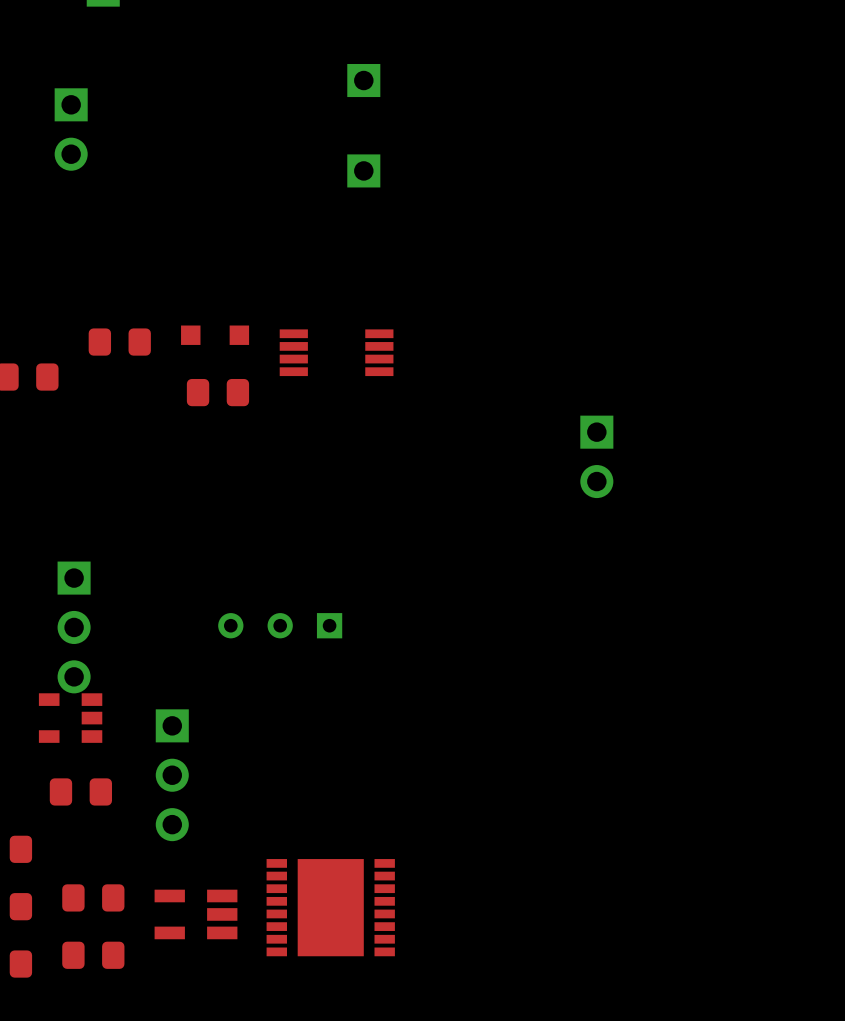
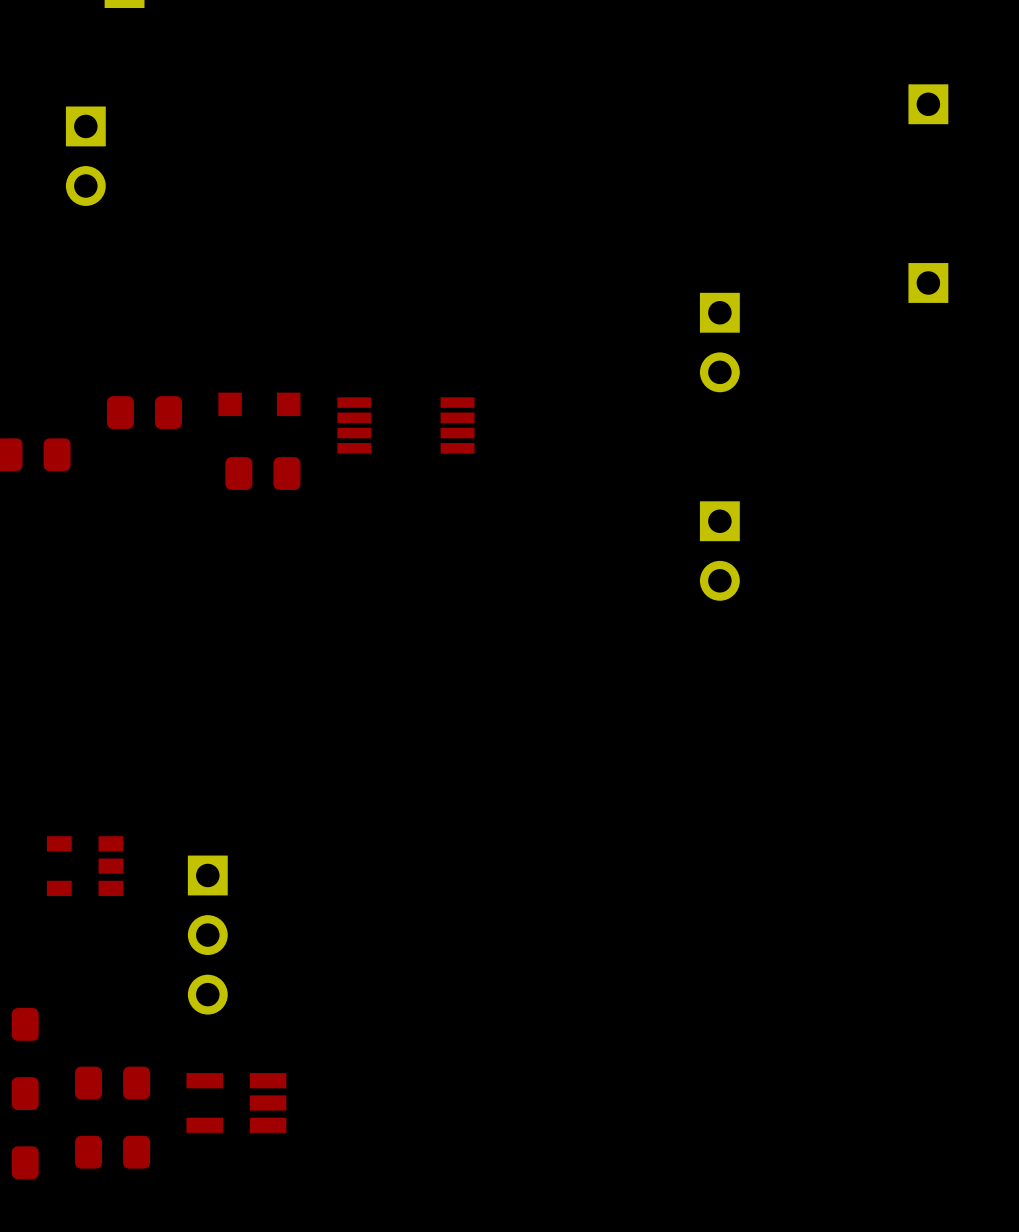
part: (363, 80) -> none
part: none -> (928, 104)
part: (363, 170) -> none
part: none -> (928, 282)
part: none -> (719, 342)
part: (280, 625) -> none
part: (74, 627) -> none
part: (80, 791) -> none
part: (330, 907) -> none

